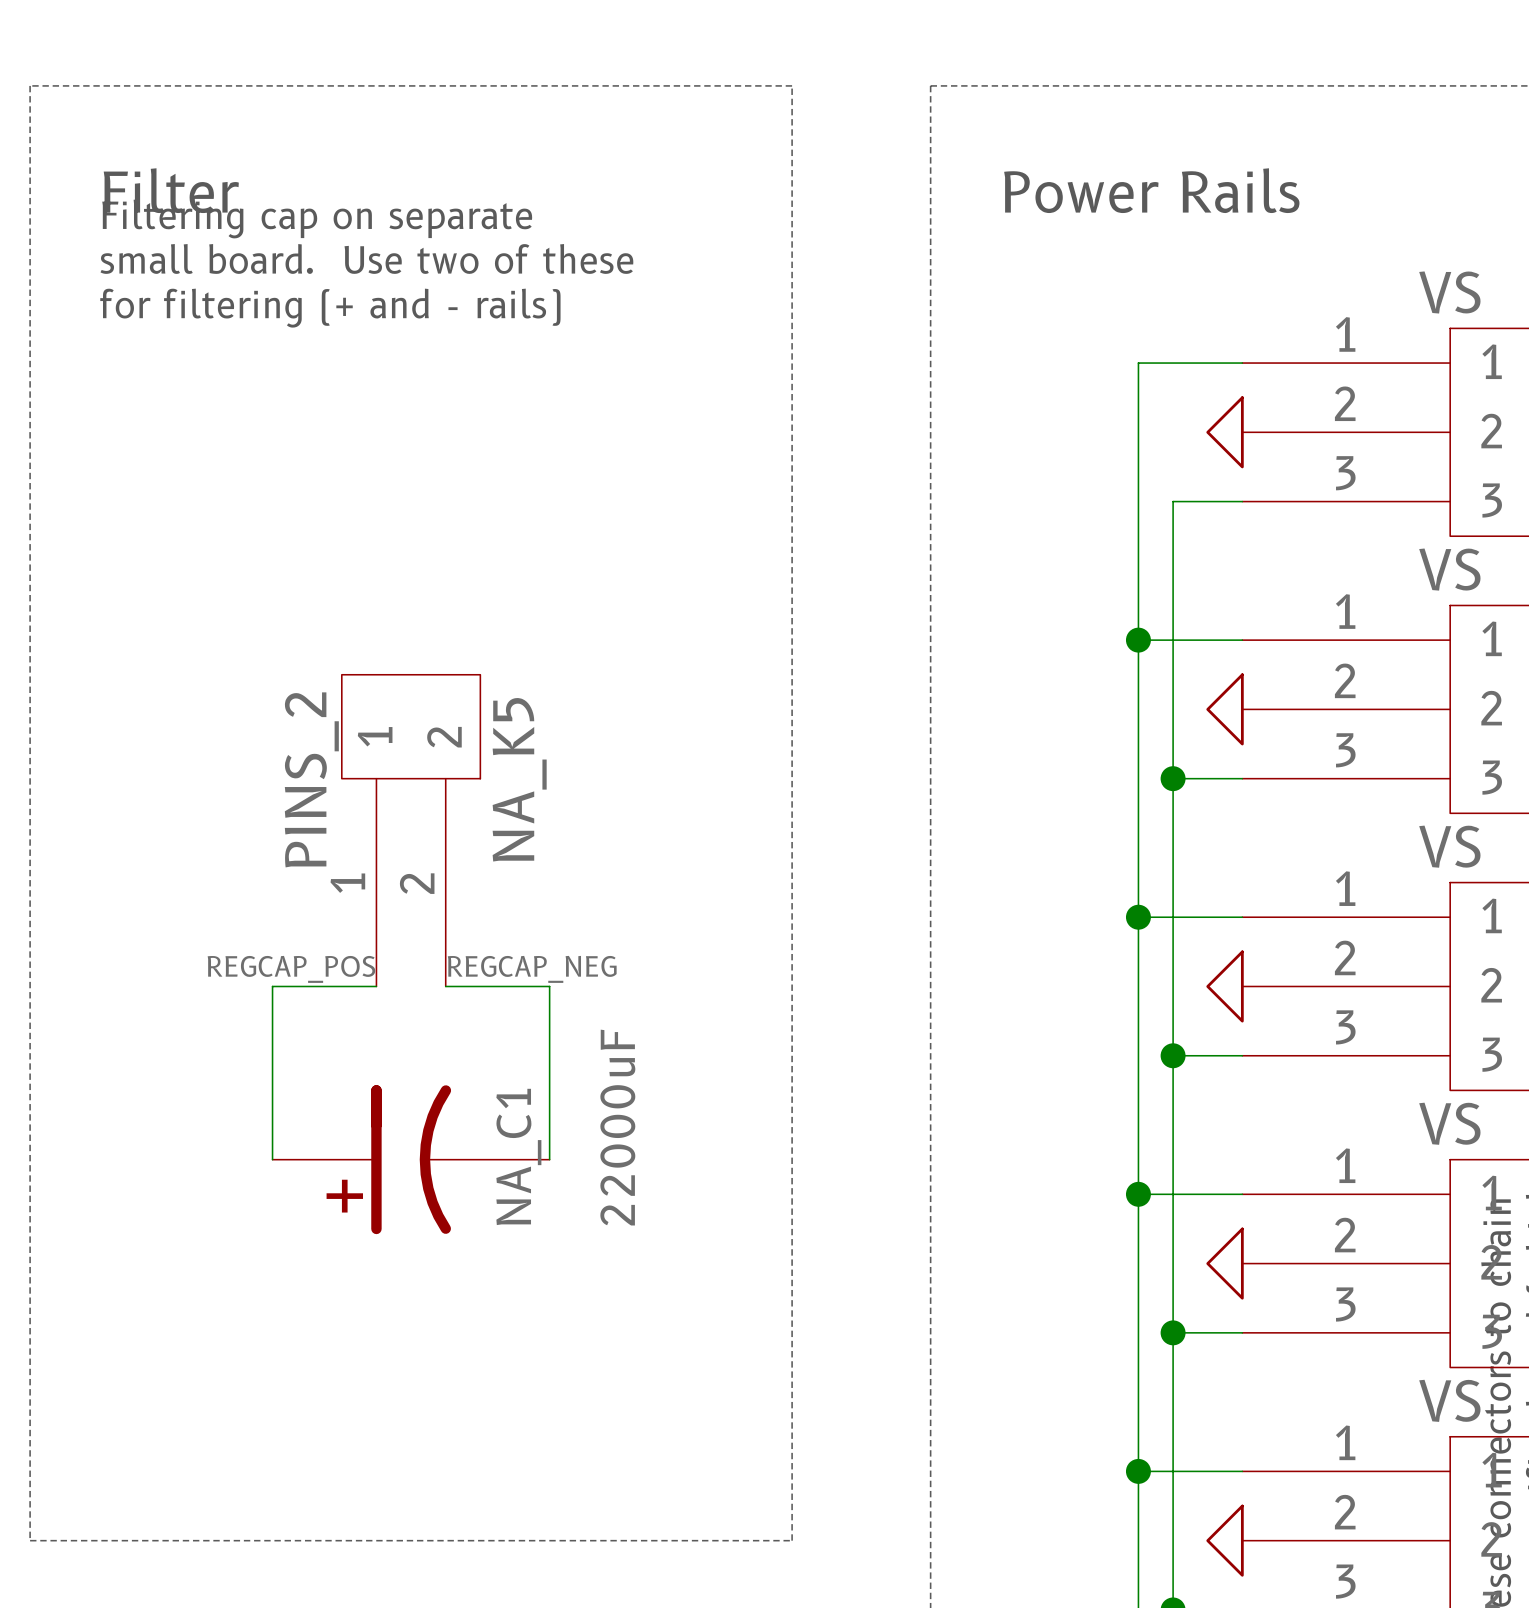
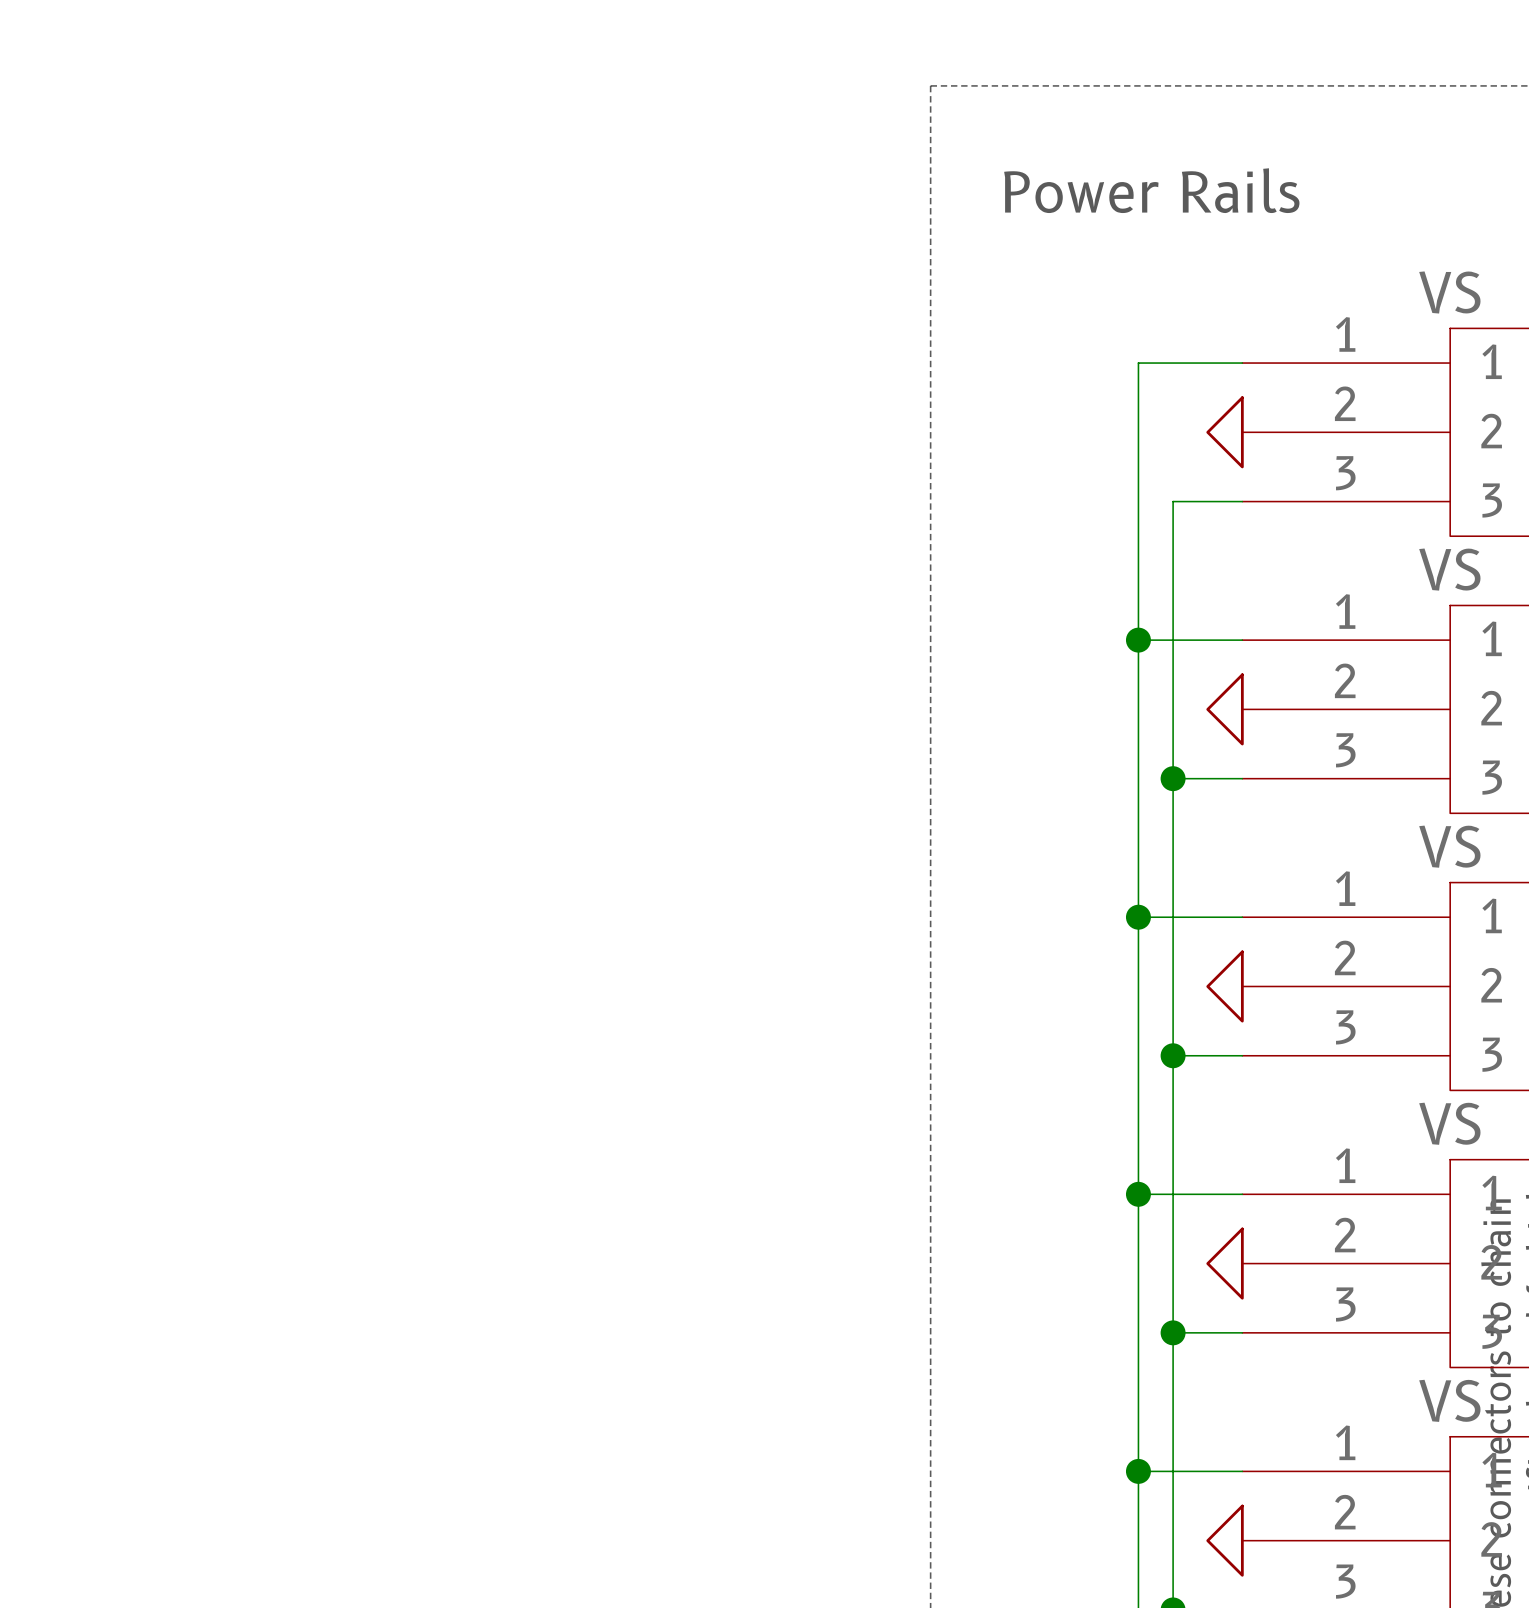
line: (30, 85) (792, 85) (792, 1540) (30, 1540) (30, 85) -> none
text: Filter (171, 190) -> none
text: Filtering cap on separate (317, 218) -> none
text: small board. Use two of these (366, 258) -> none
text: for filtering (+ and - rails) (330, 308) -> none
NA_K5: PINS_2 (411, 830) -> none
label: REGCAP_POS (291, 969) -> none
label: REGCAP_NEG (532, 969) -> none
wire: (376, 986) (272, 986) (272, 1159) -> none
wire: (445, 986) (549, 986) (549, 1159) -> none
NA_C1: 22000uF (411, 1159) -> none

